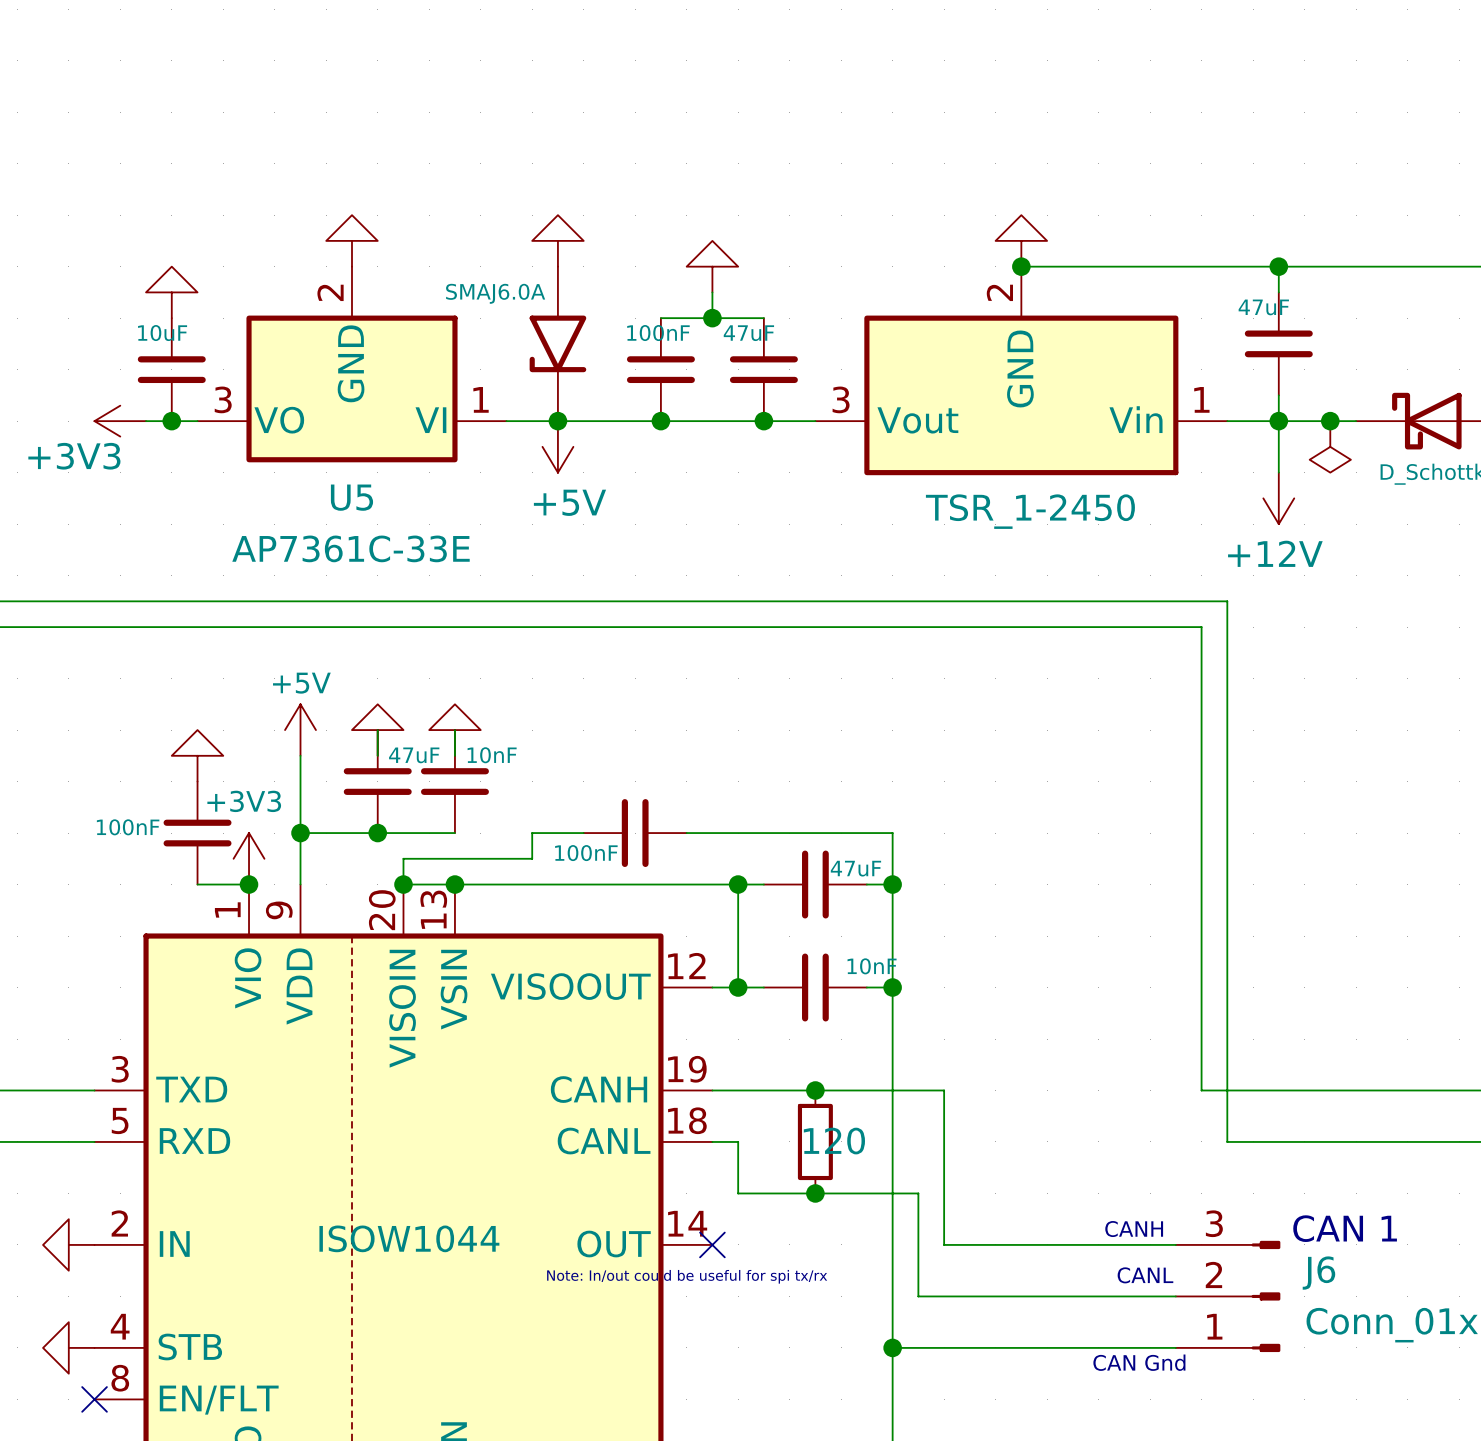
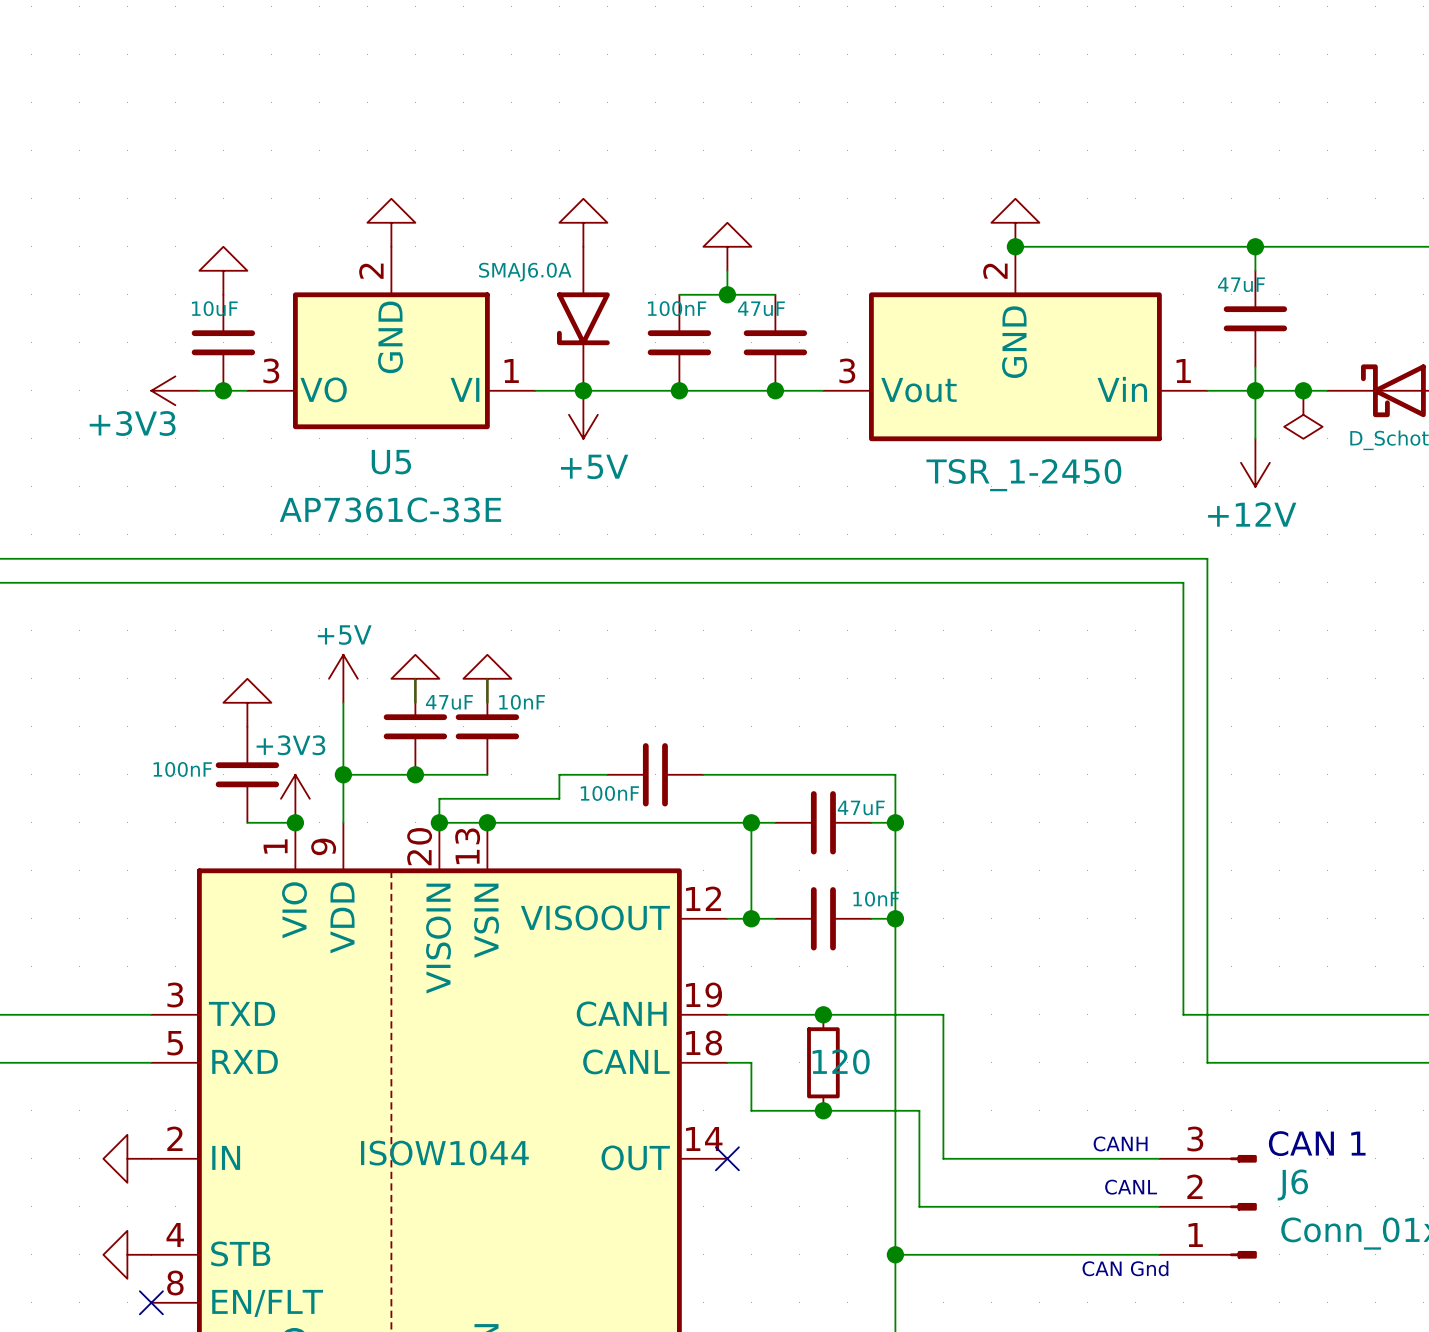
text: Note: In/out could be useful for spi tx/rx (687, 1276) -> none

